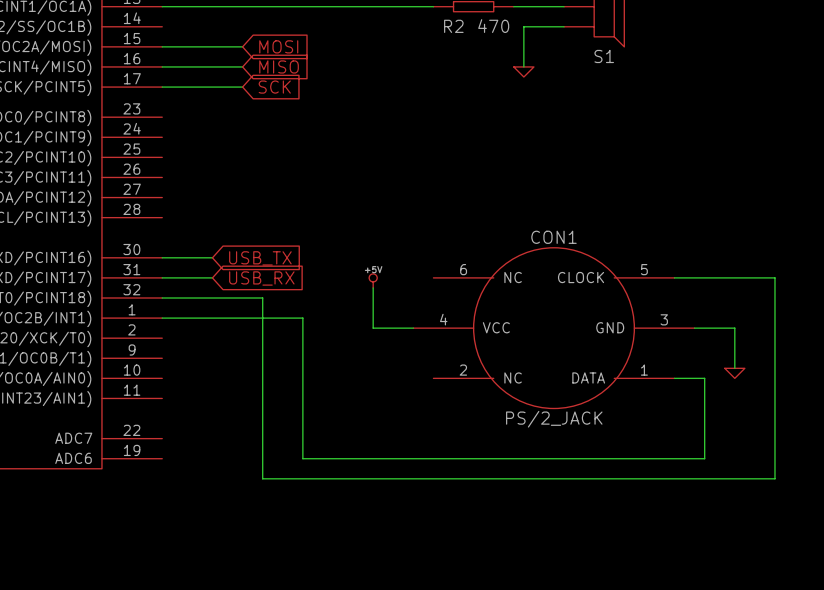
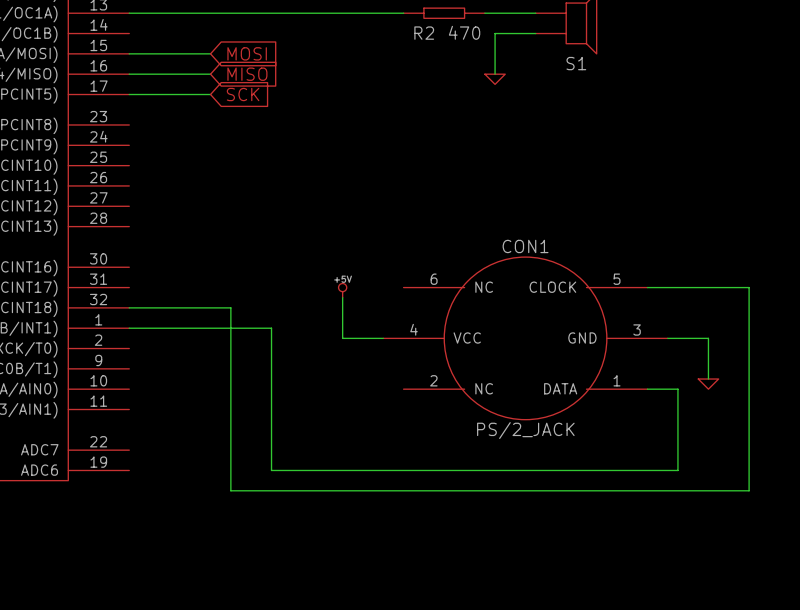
wire: (162, 257) (212, 257) -> none
global label: USB_TX (260, 258) -> none
wire: (162, 277) (212, 277) -> none
global label: USB_RX (261, 278) -> none

